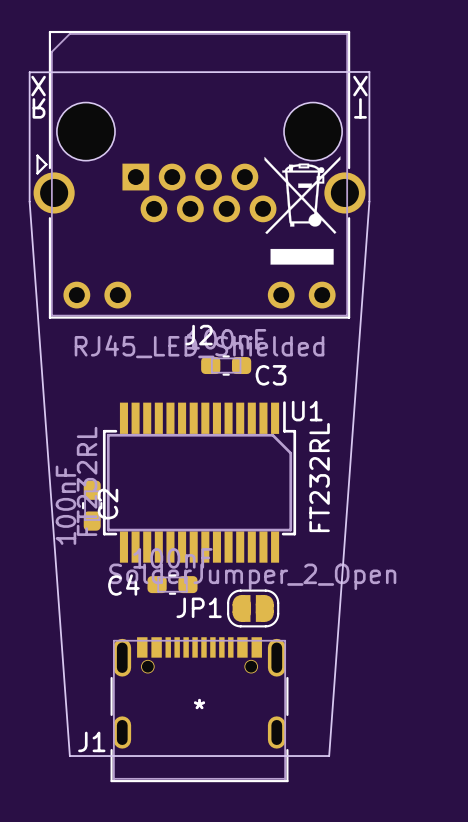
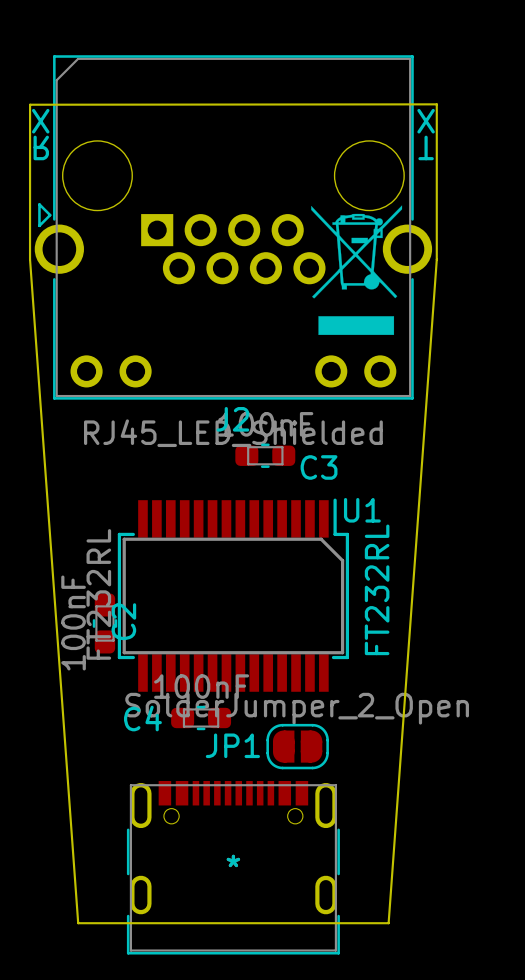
J1 name: J1 (91, 741) -> none

